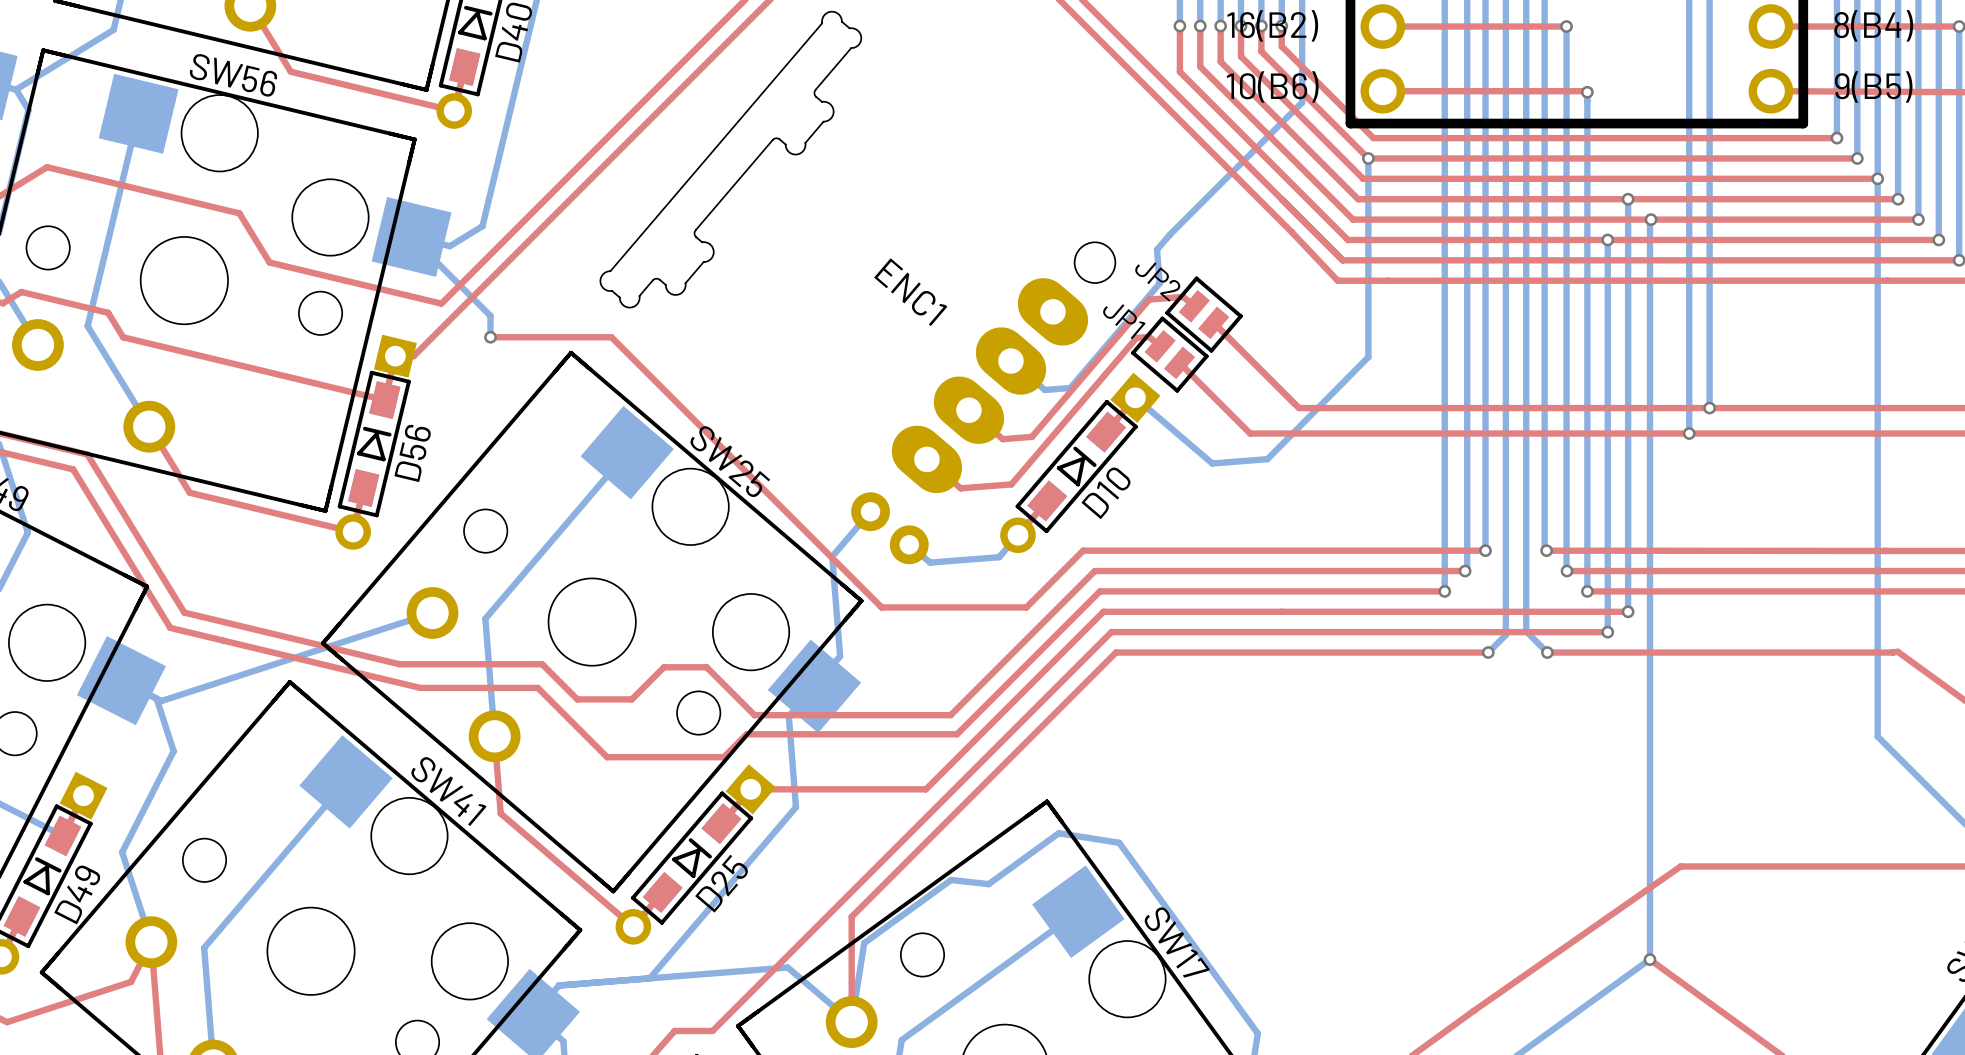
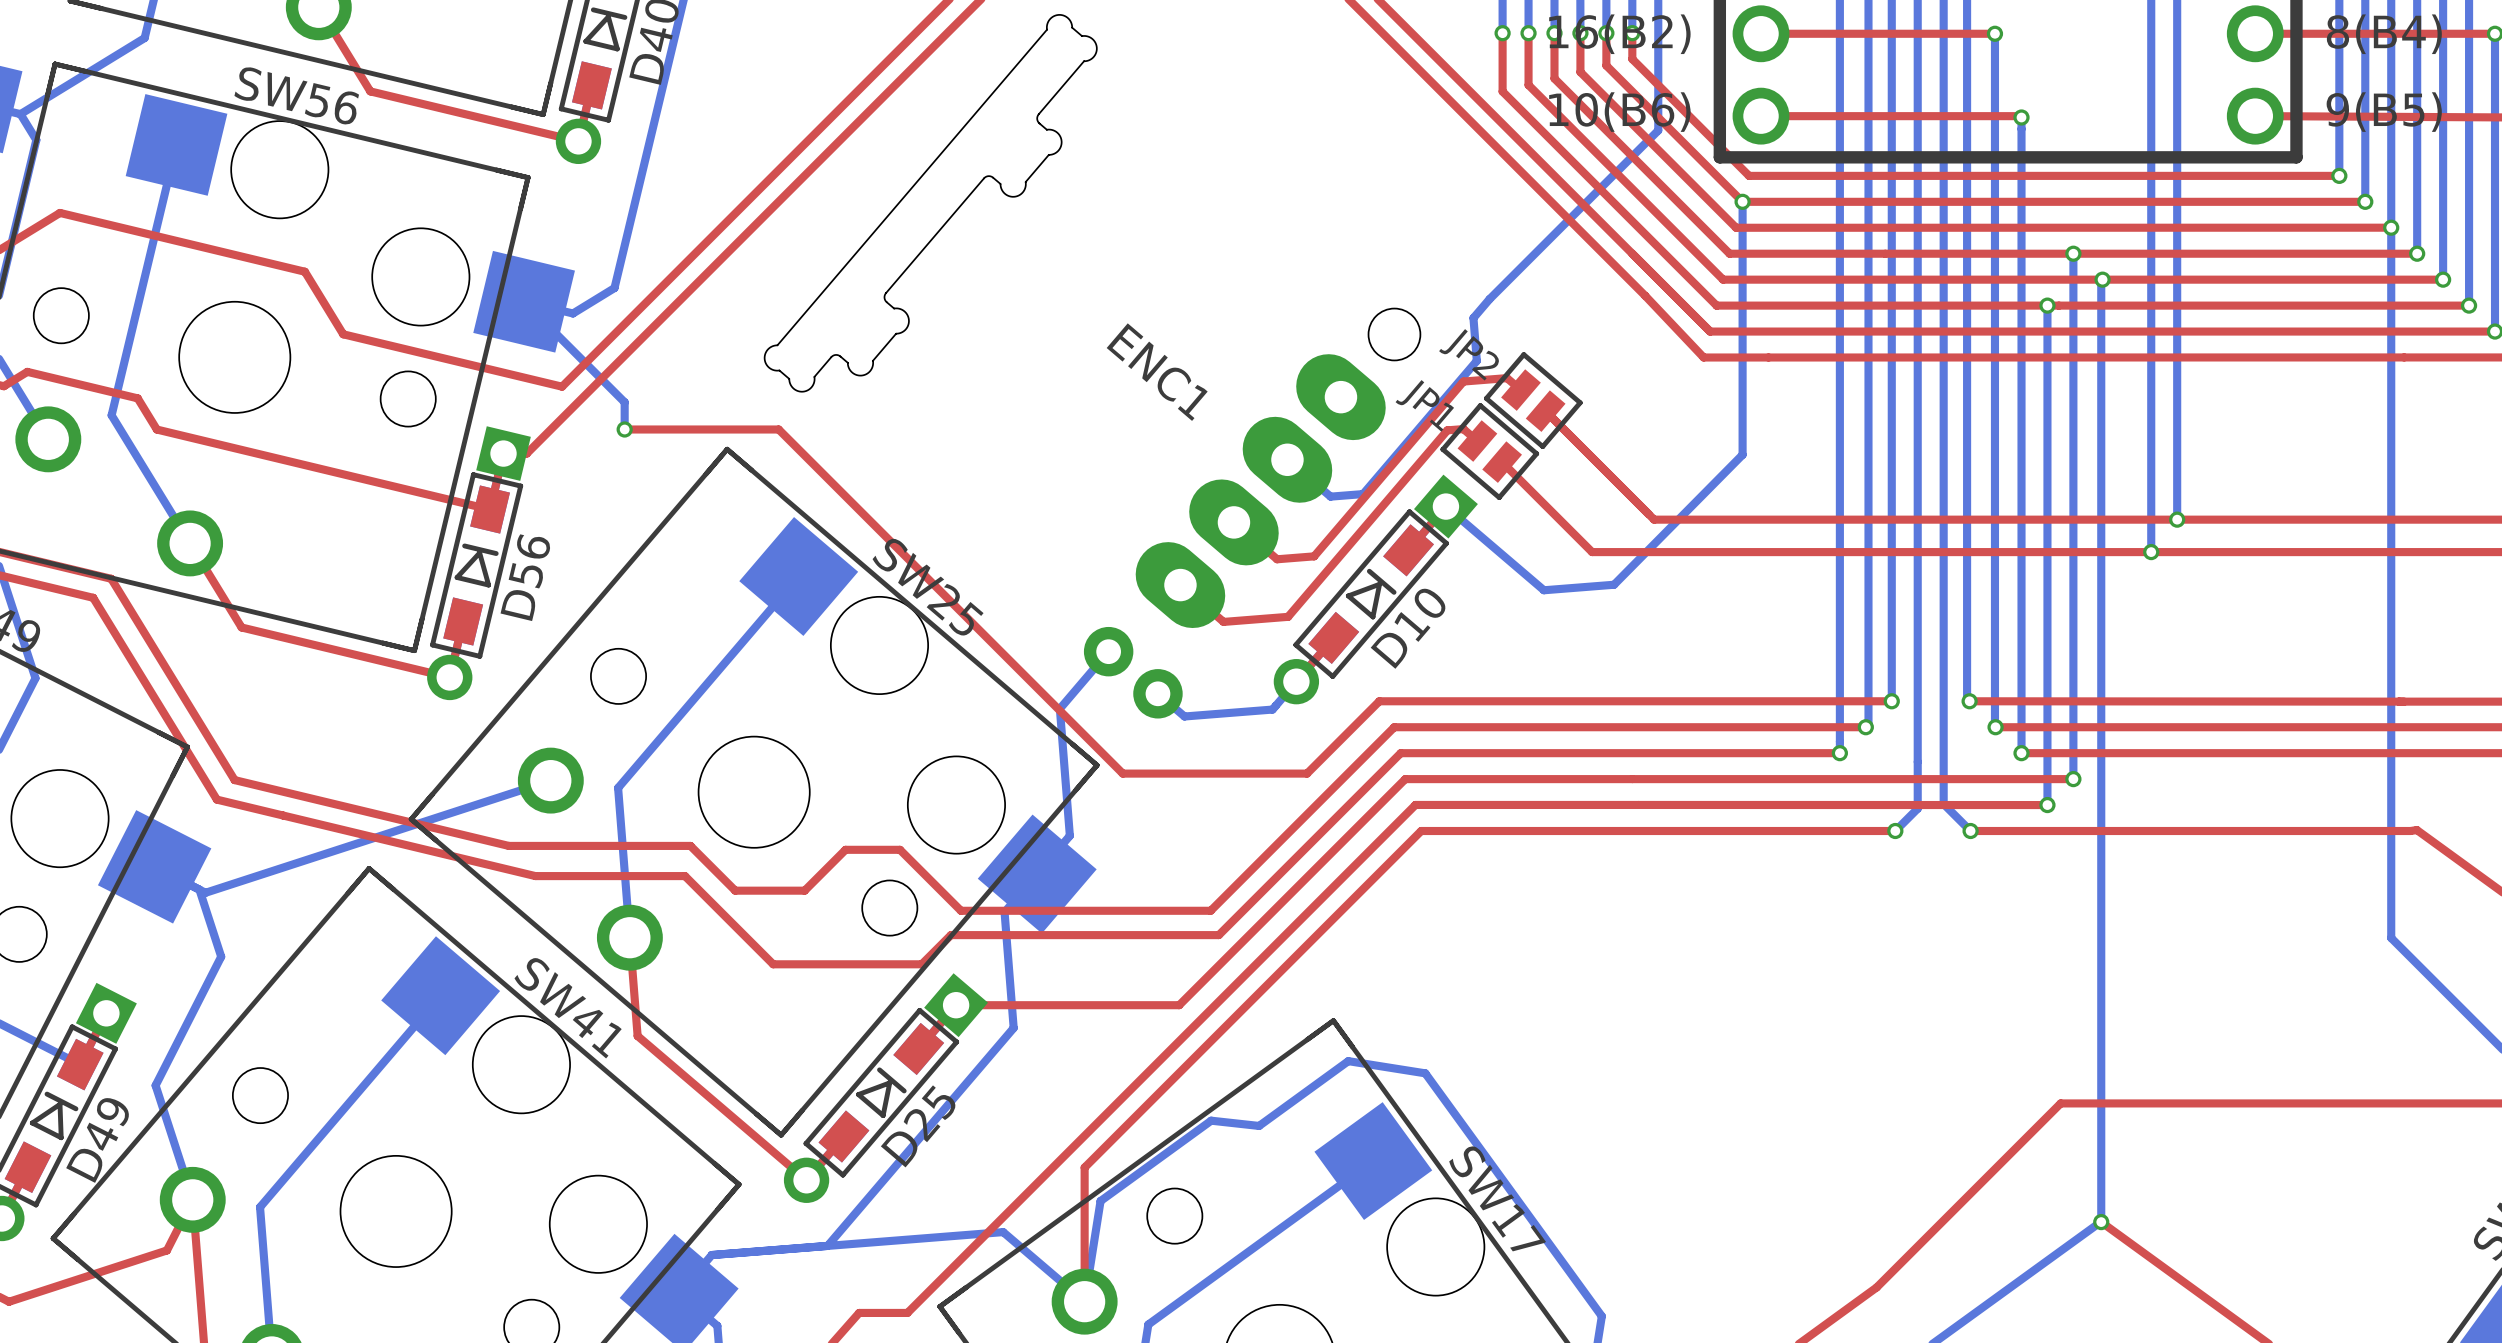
top track: (1680, 866) (1473, 1010) -> (2140, 1103) (2060, 1103) (1876, 1287)

